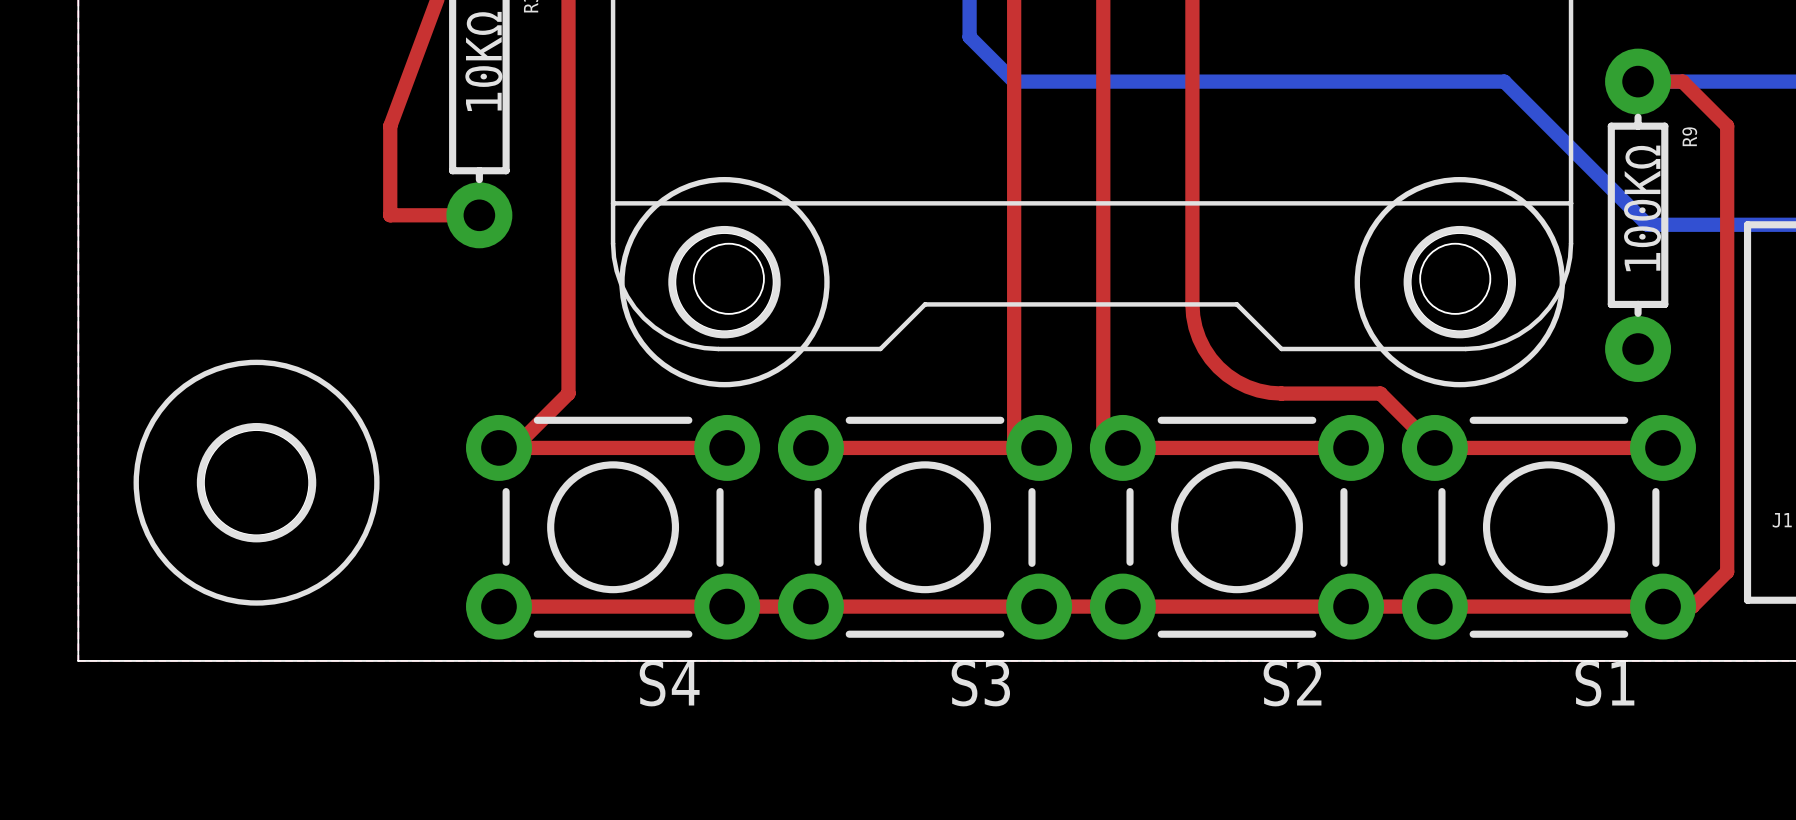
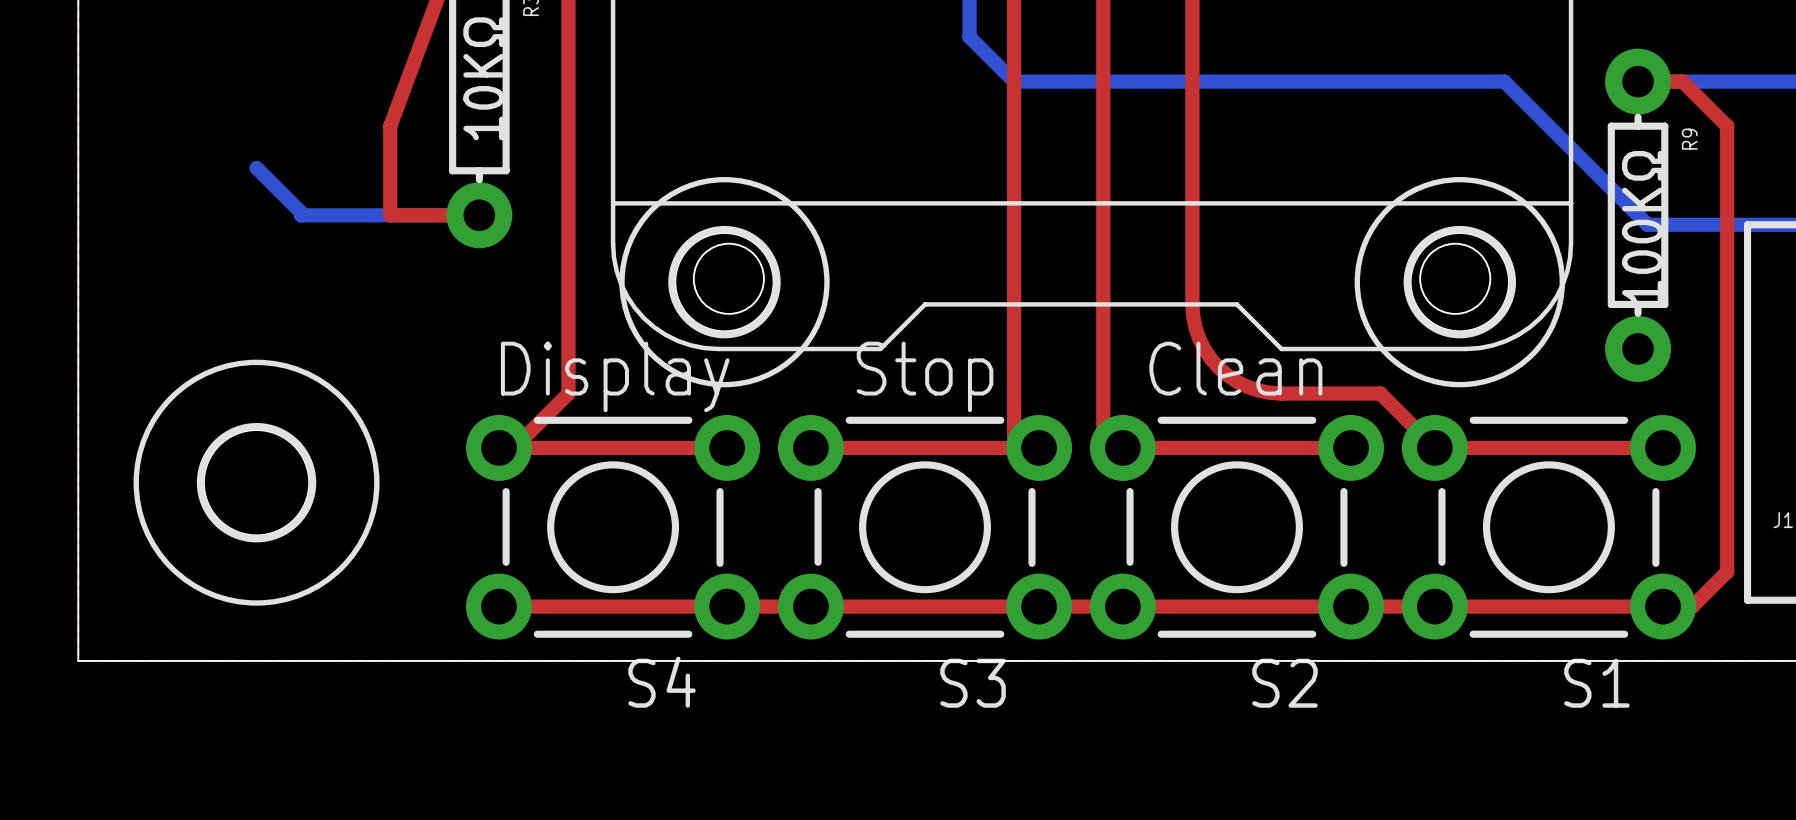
bottom track: none -> (256, 167) (301, 212) (301, 215) (479, 215)
text: none -> Clean (1235, 368)
text: none -> Display (615, 376)
text: none -> Stop (925, 376)

